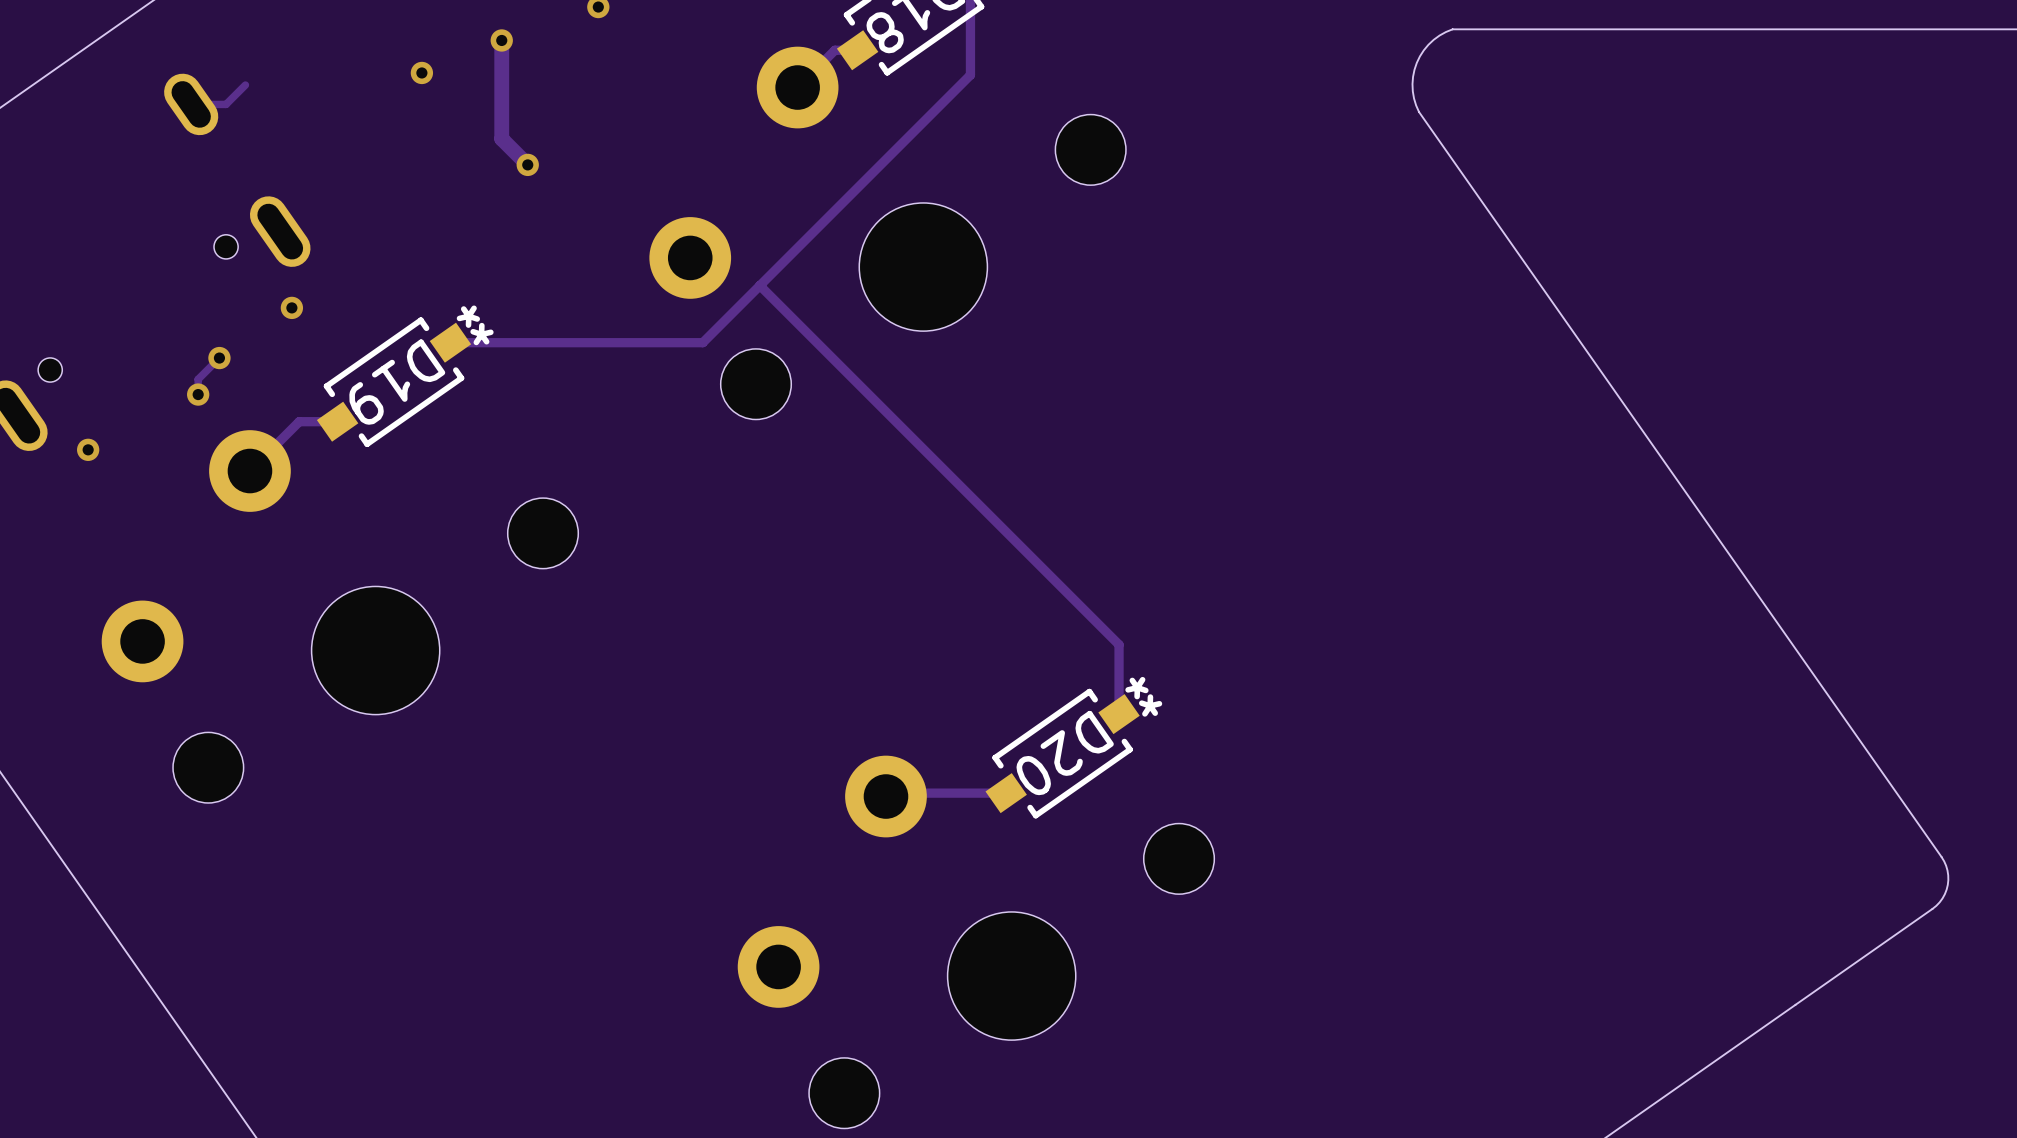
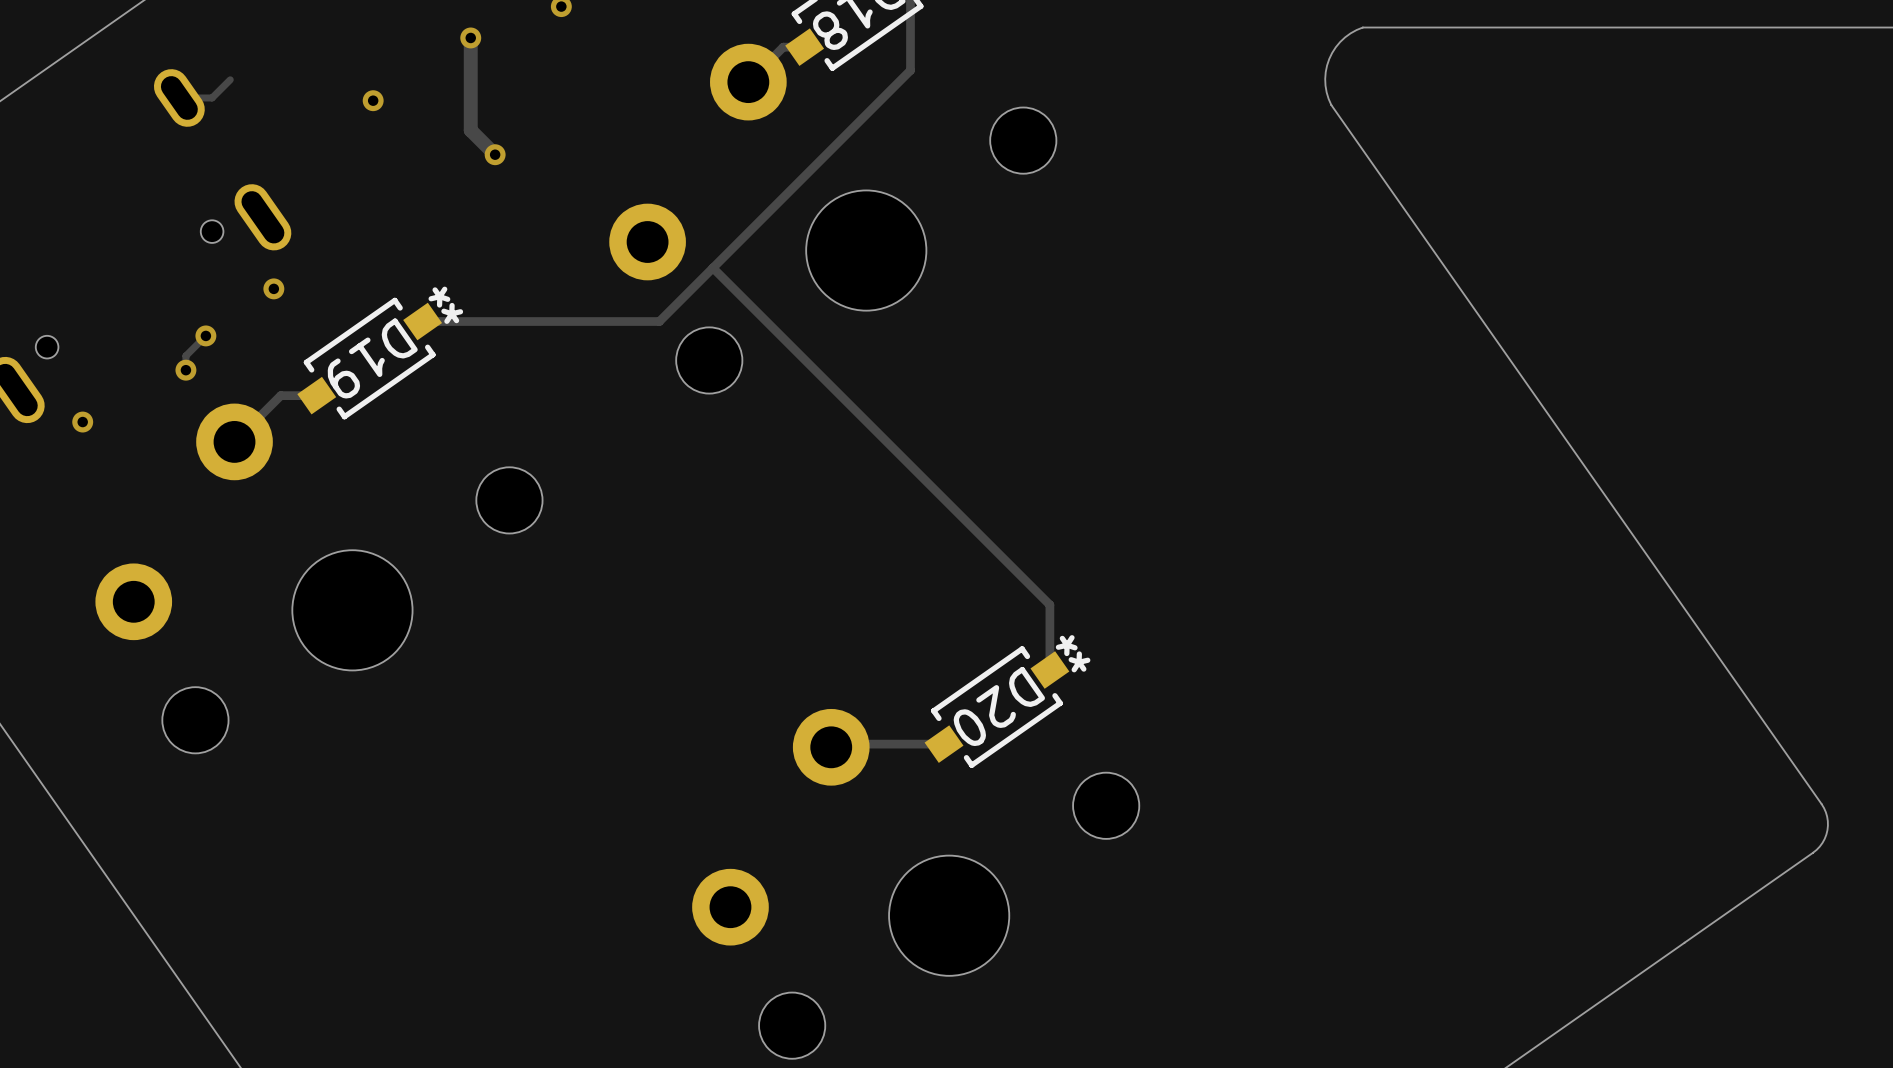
via position: (421, 72) -> (373, 100)

